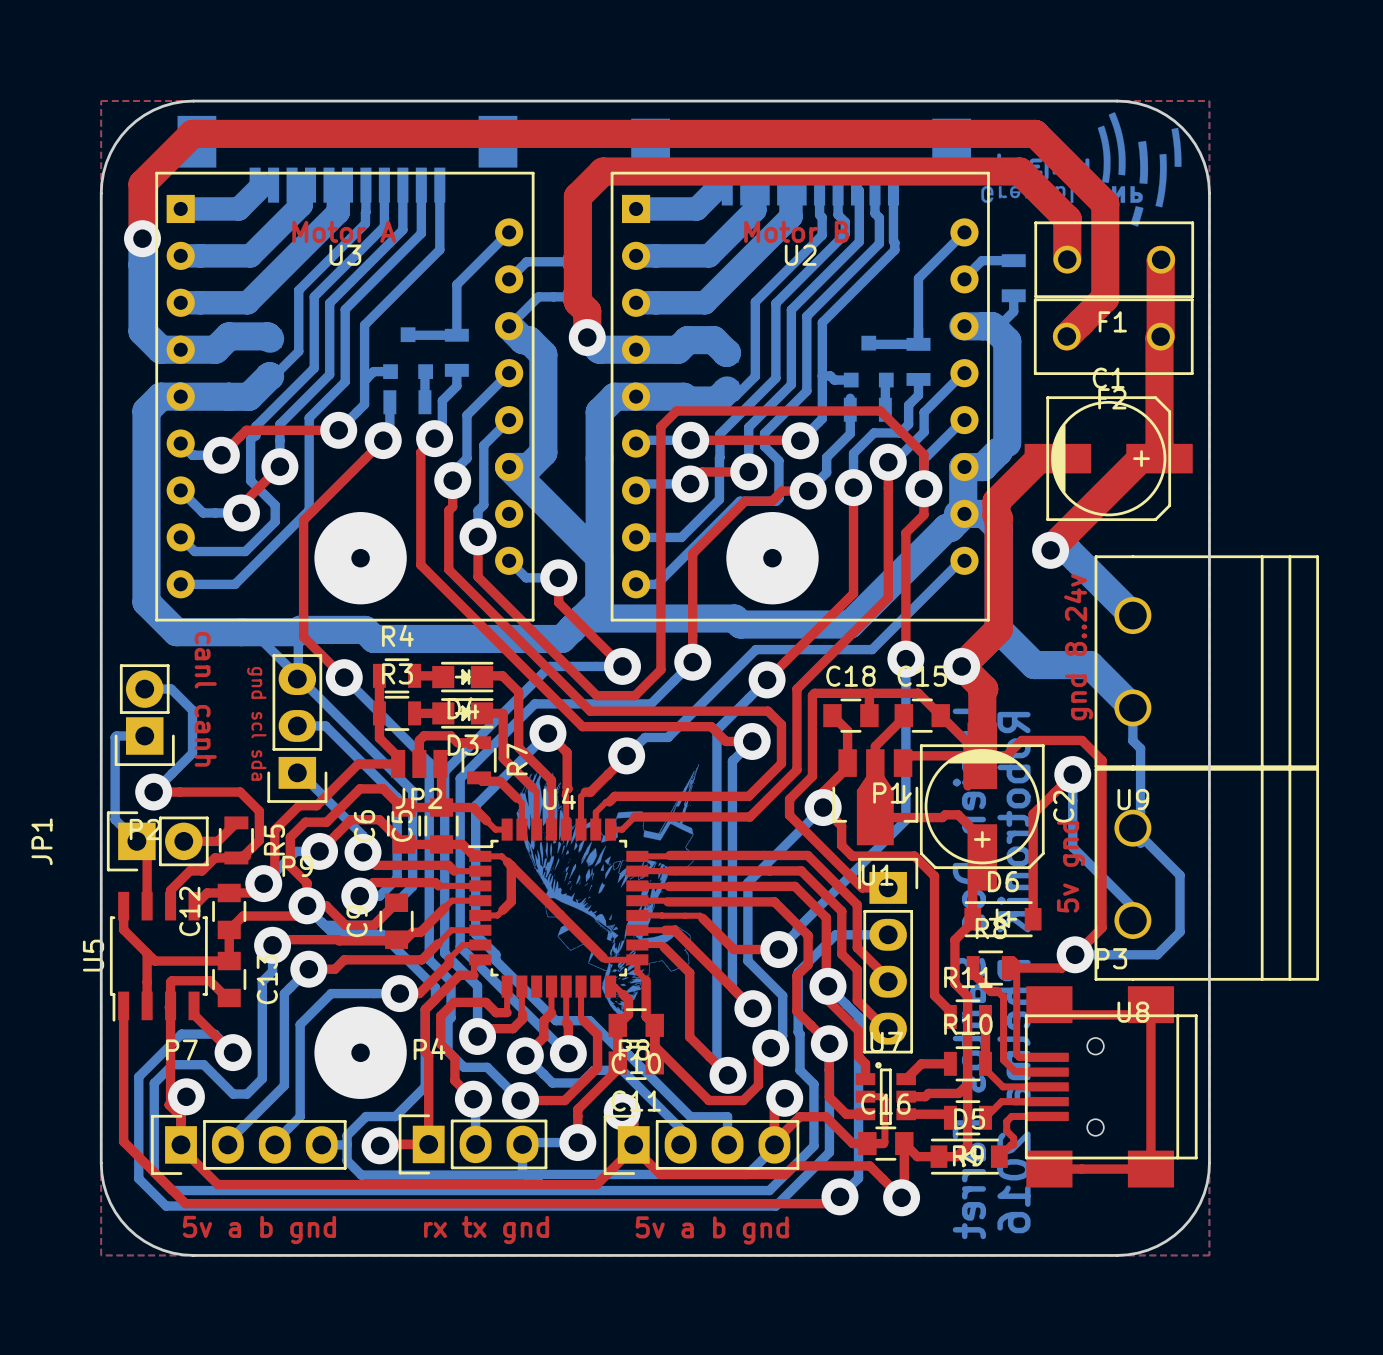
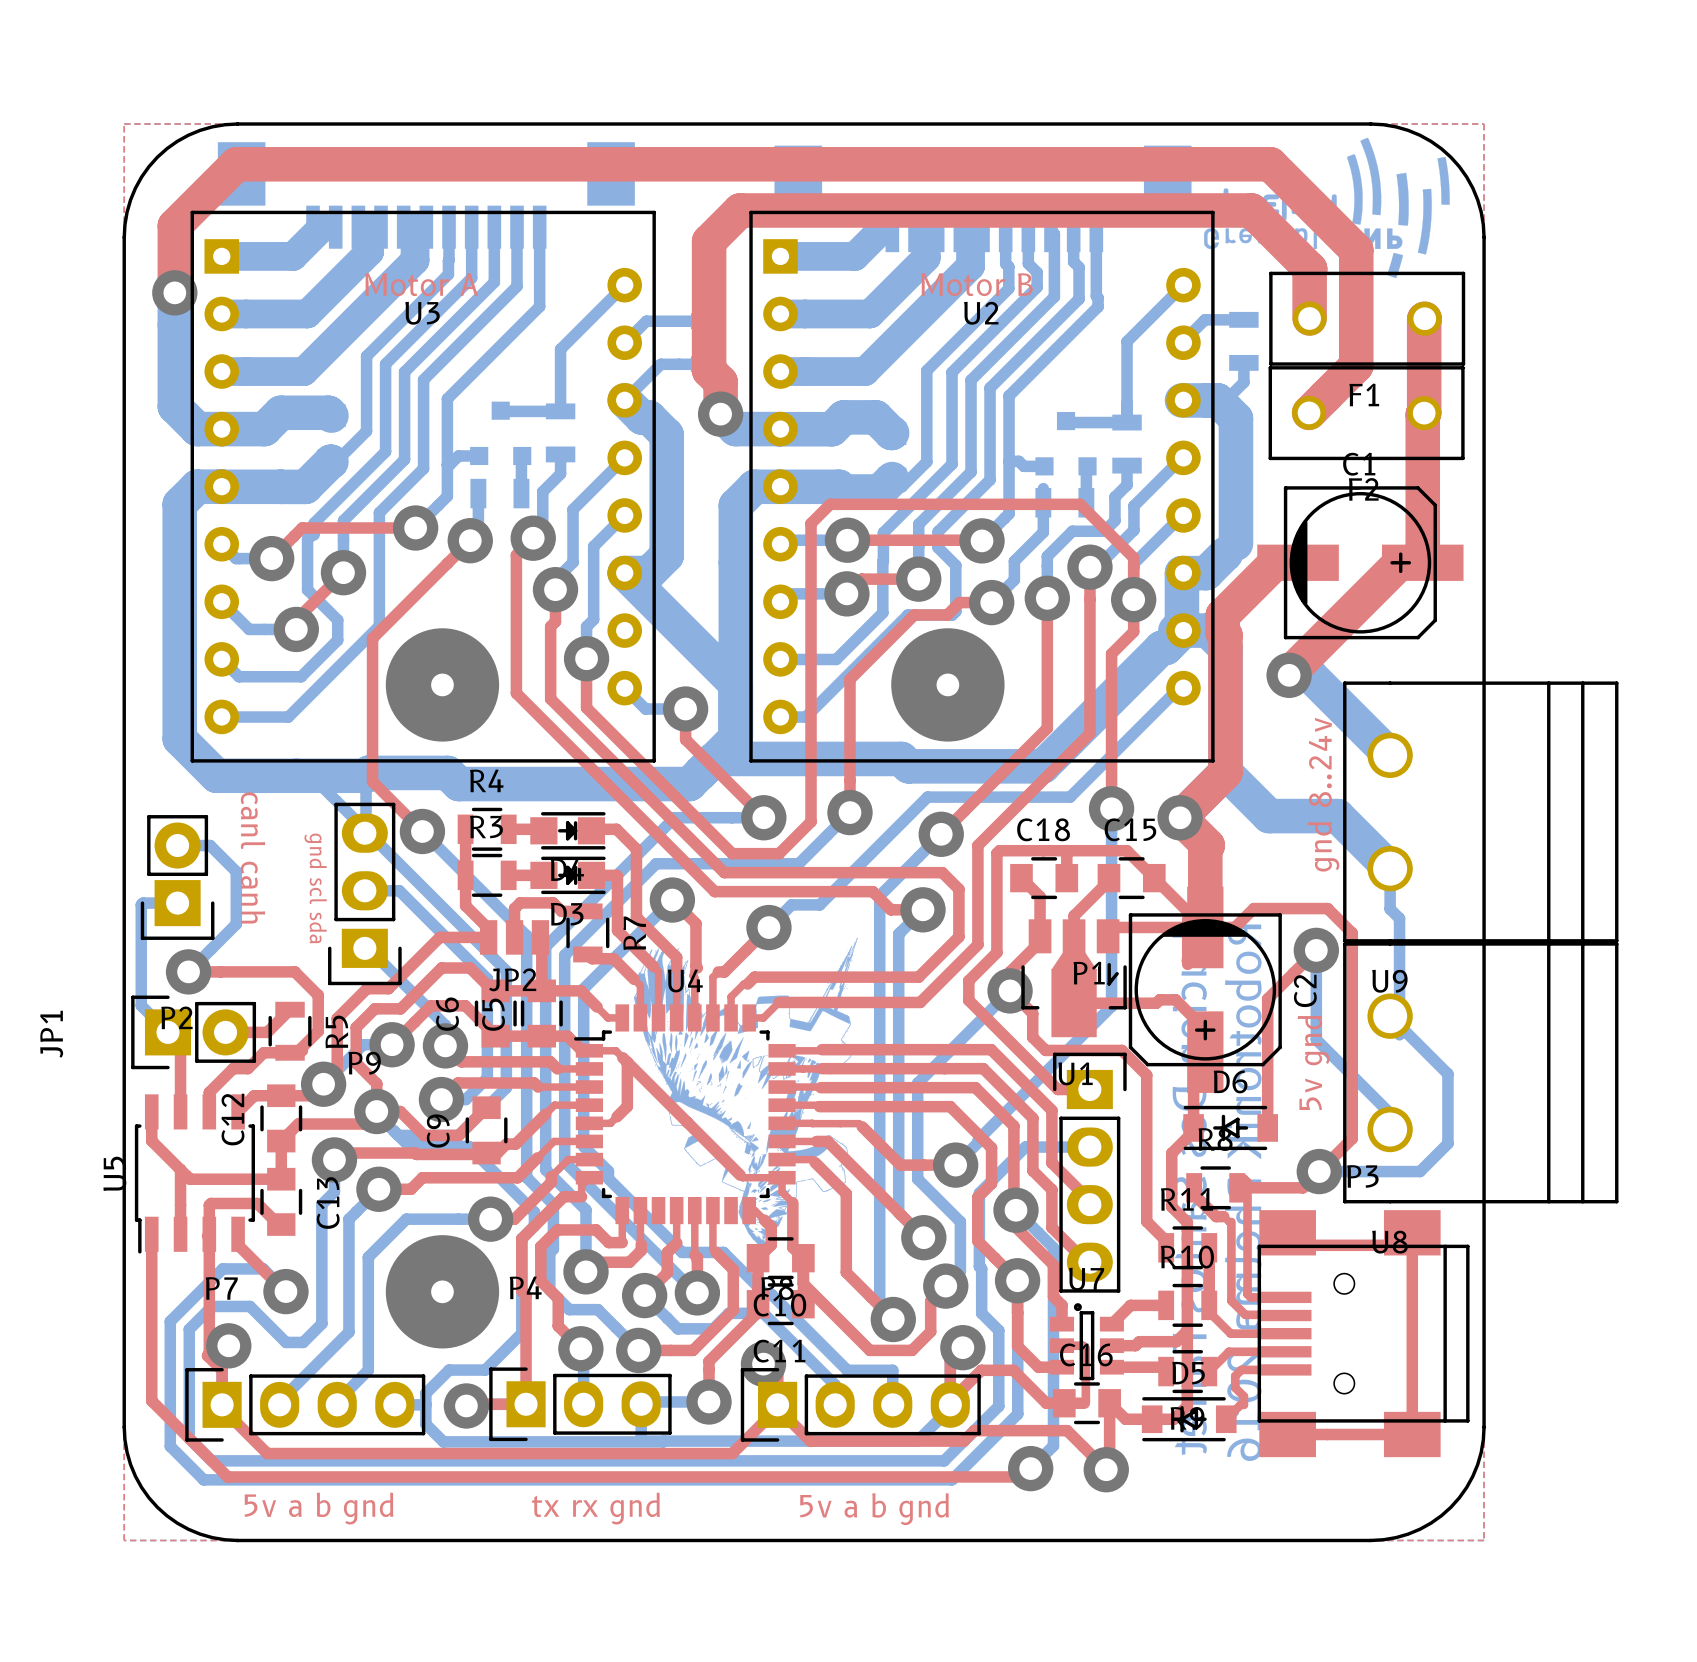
text: rx tx gnd (486, 1229) -> tx rx gnd (595, 1508)

